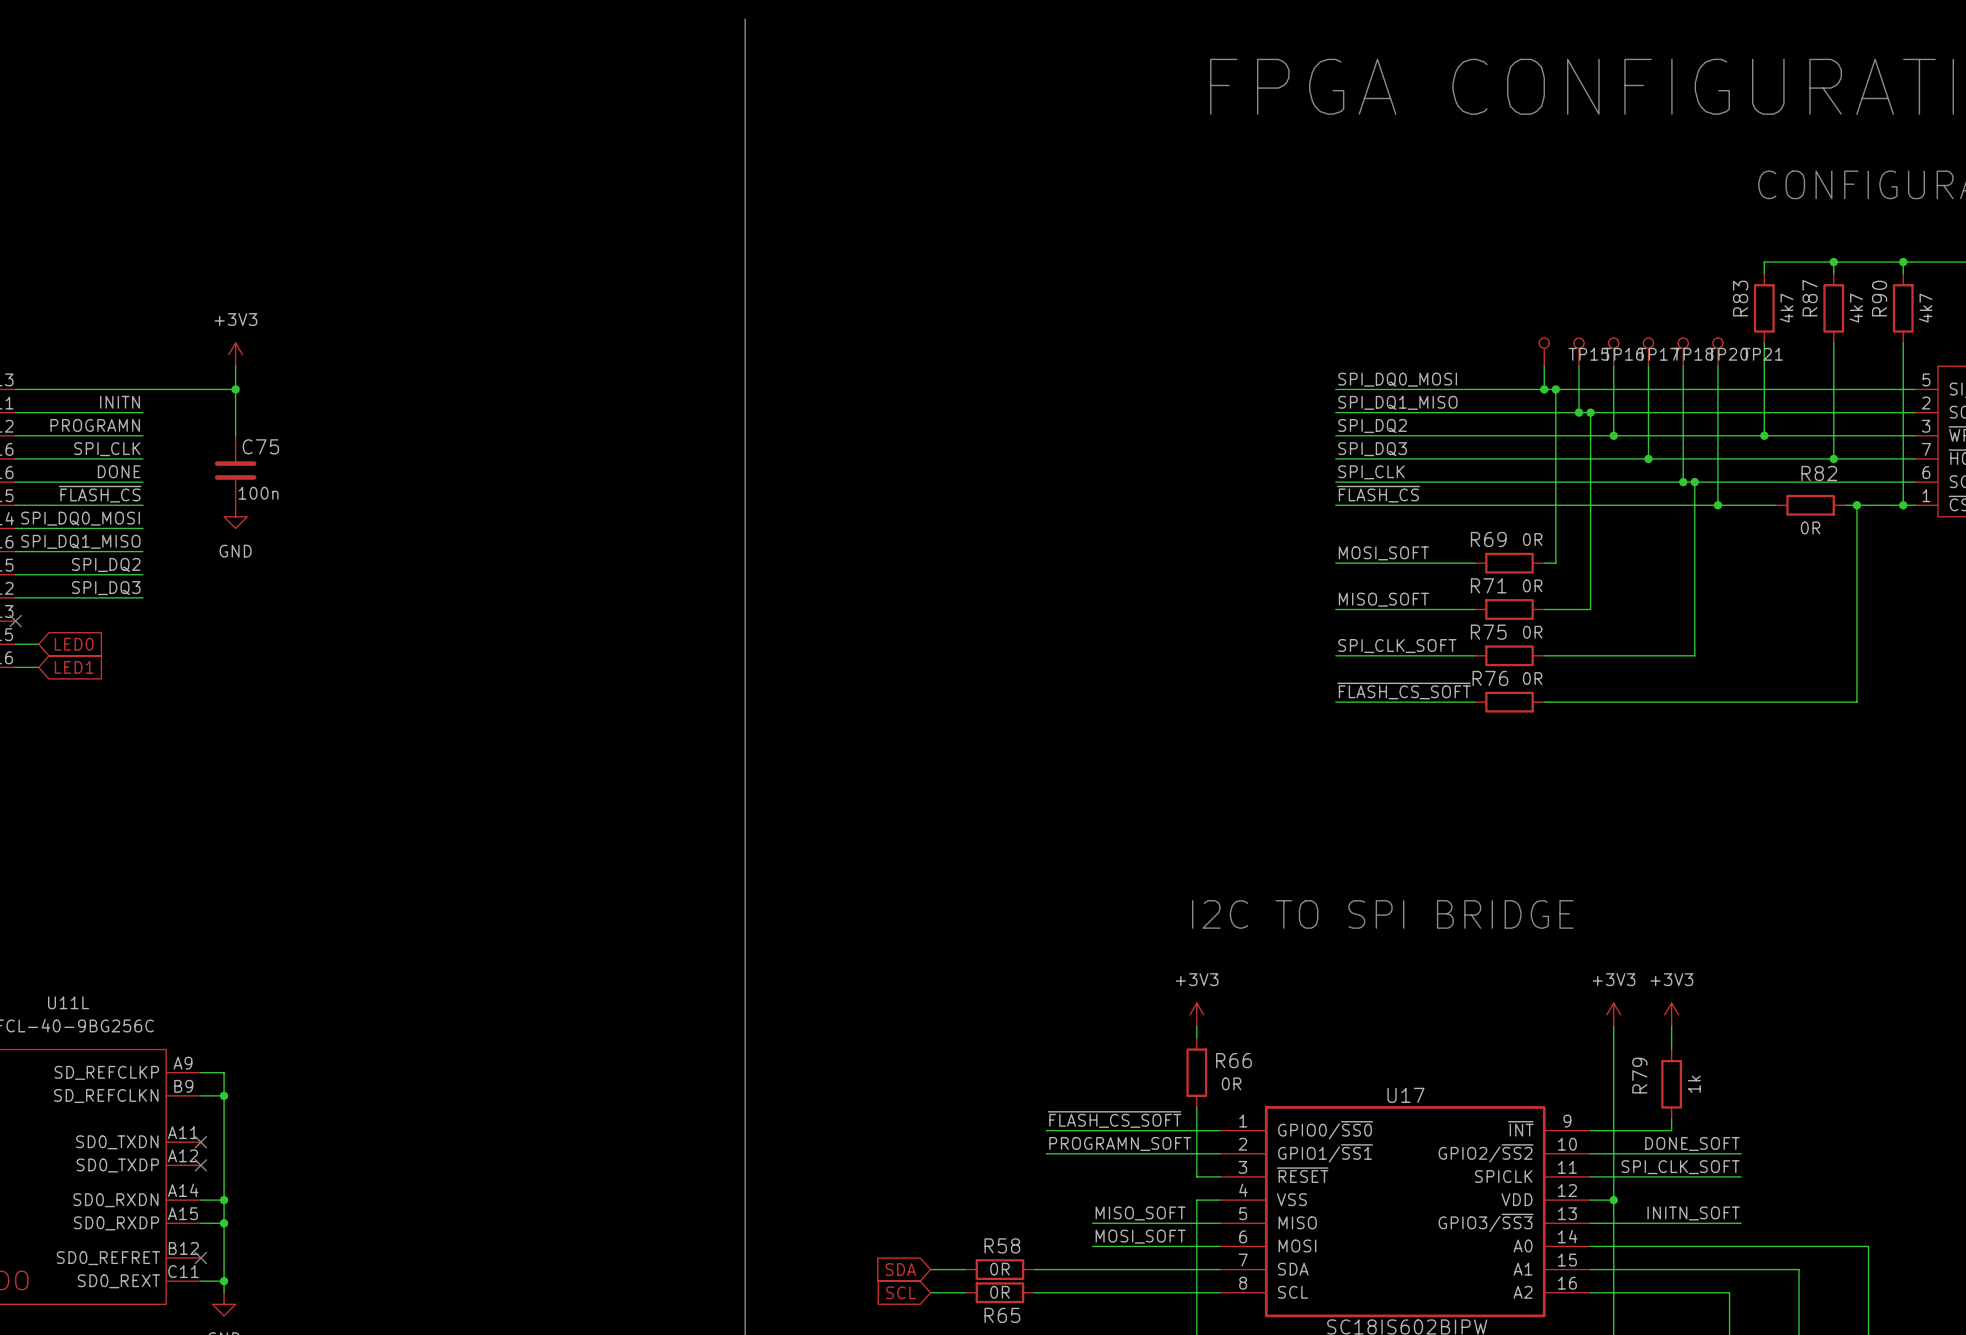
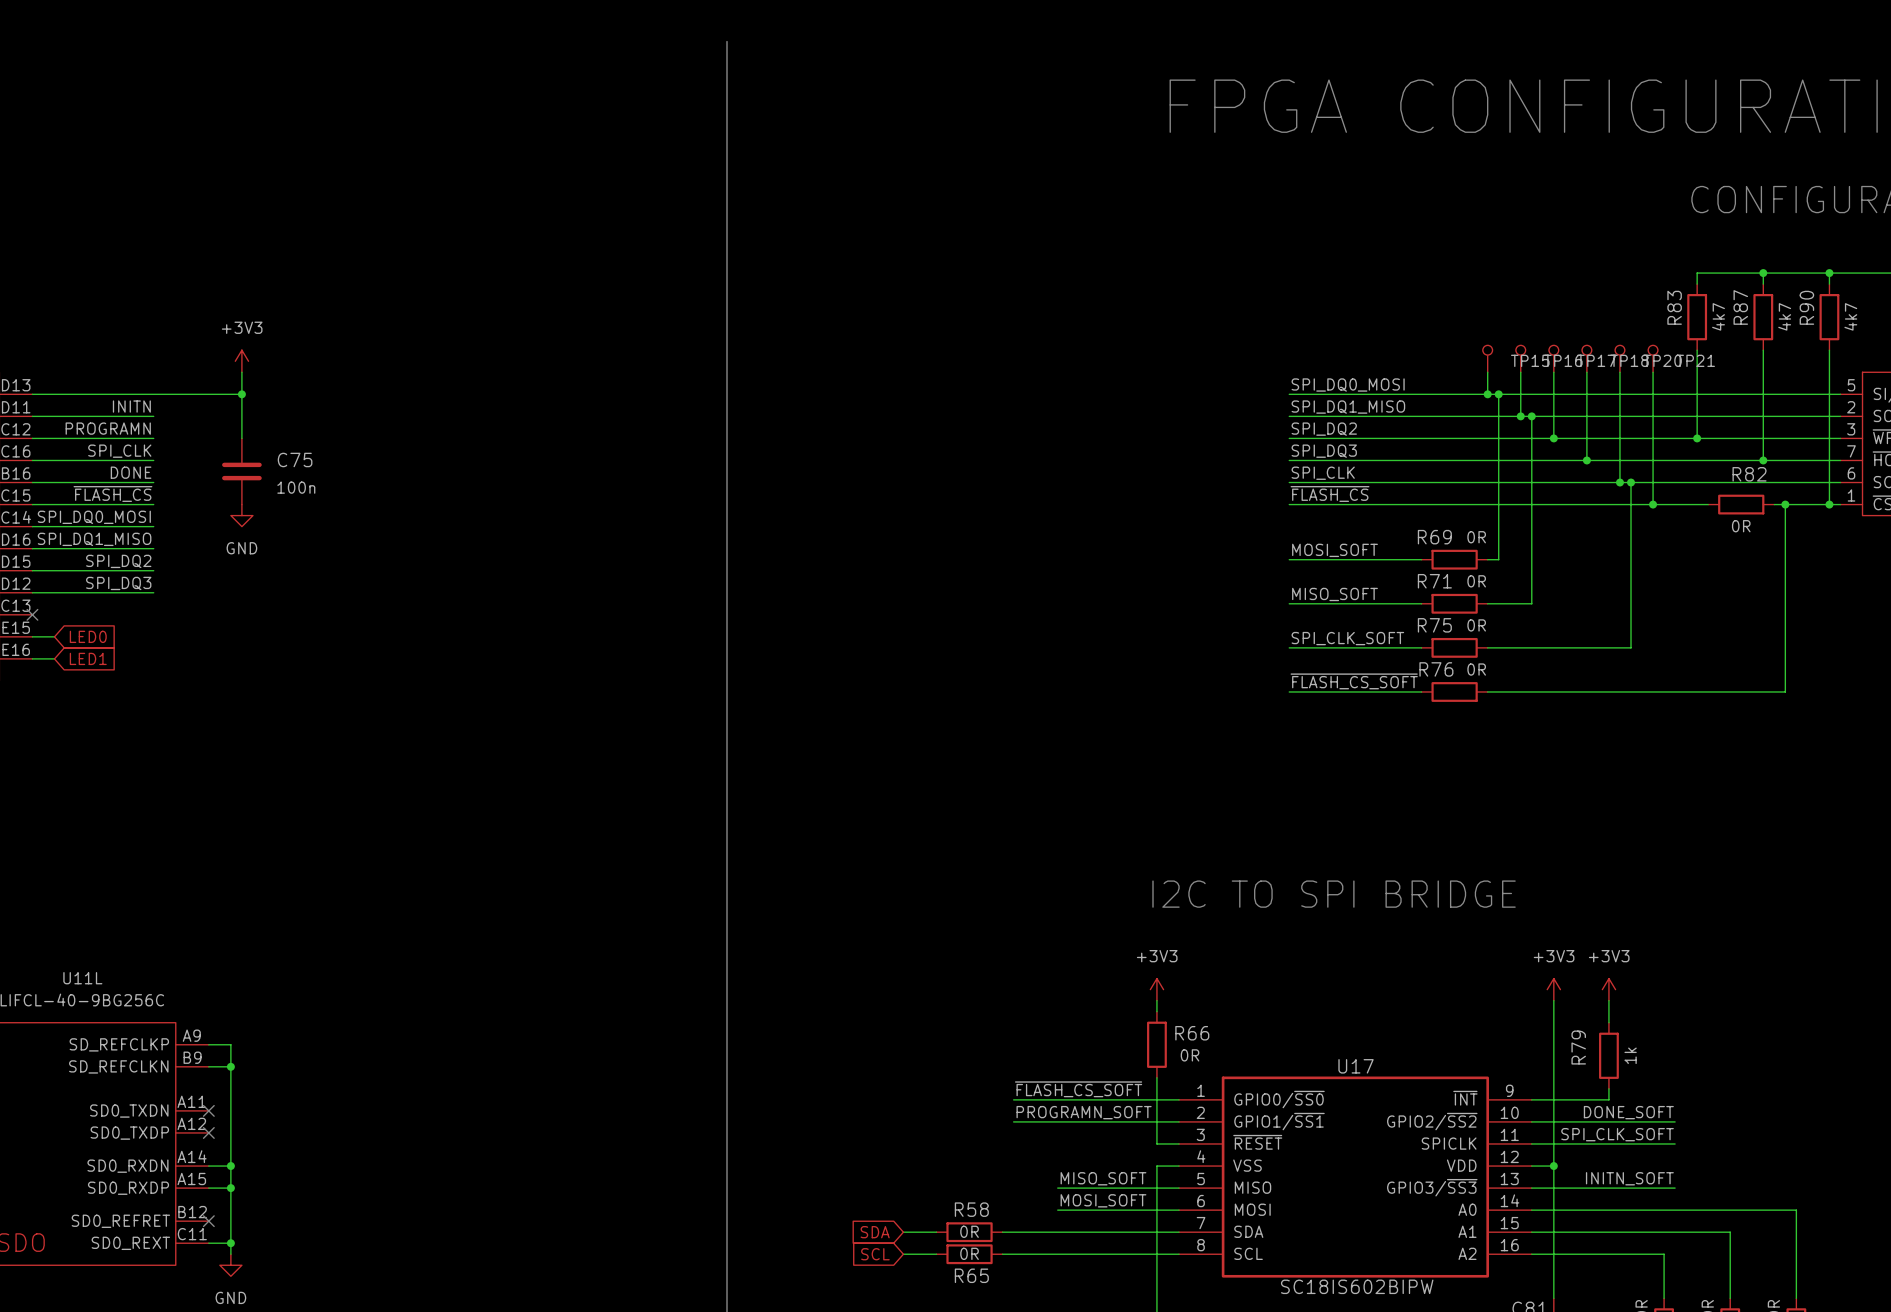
C75 name position: C75 (260, 446) -> C75 (295, 459)
C75 text position: 100n (258, 493) -> 100n (296, 487)

